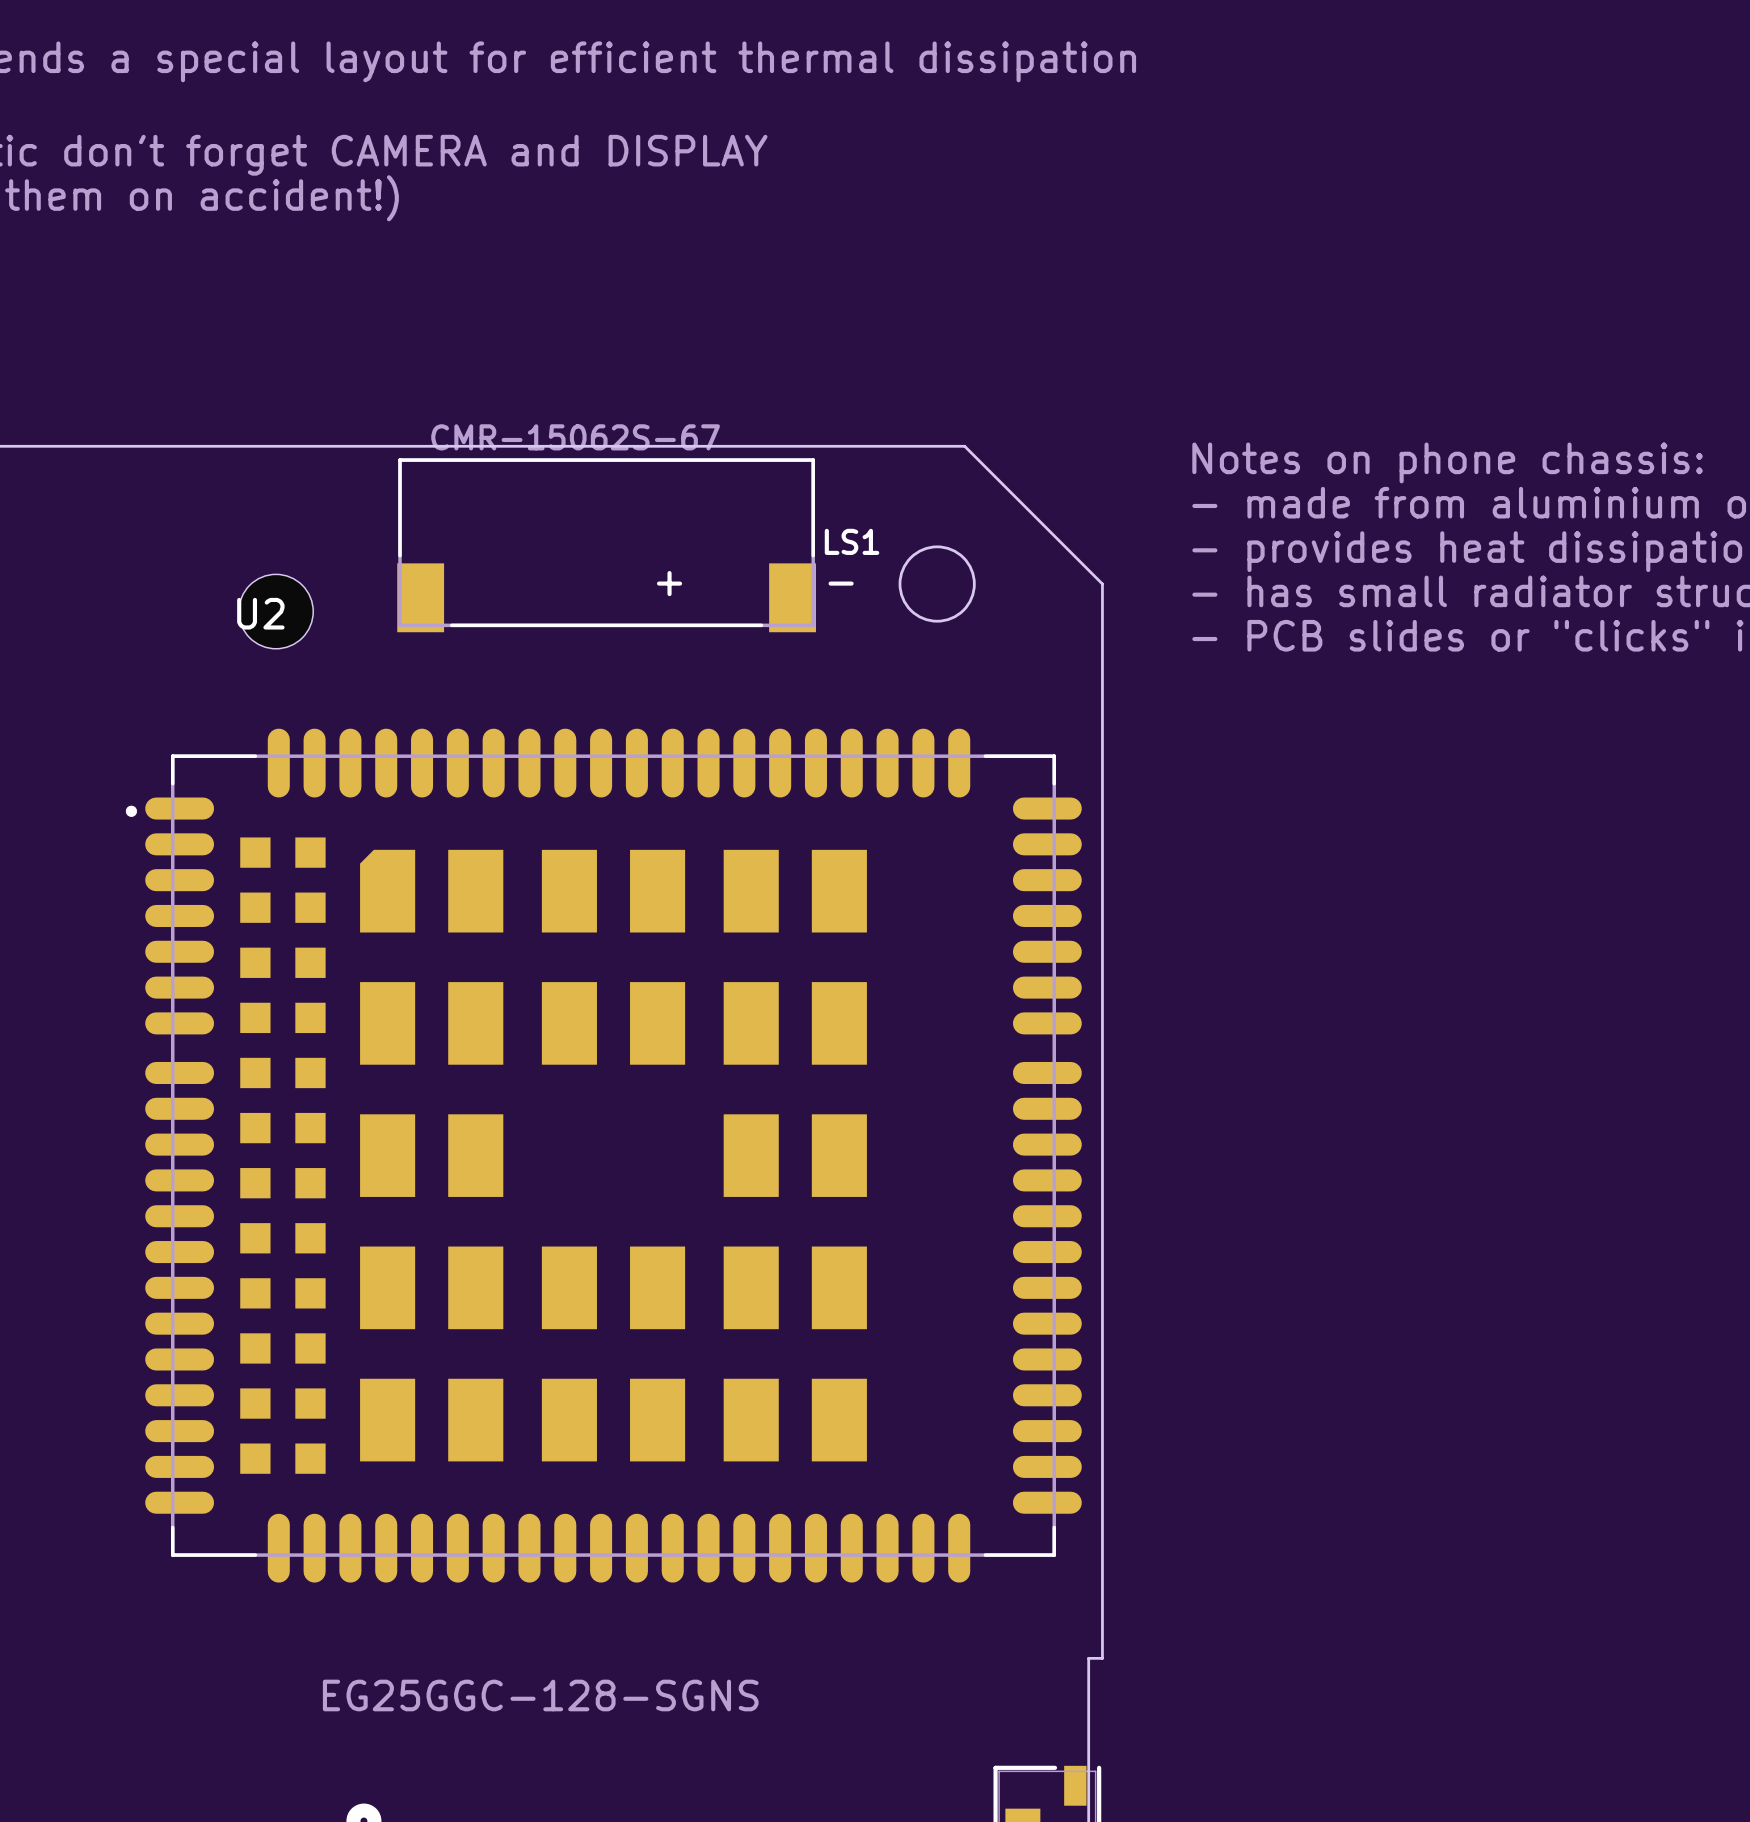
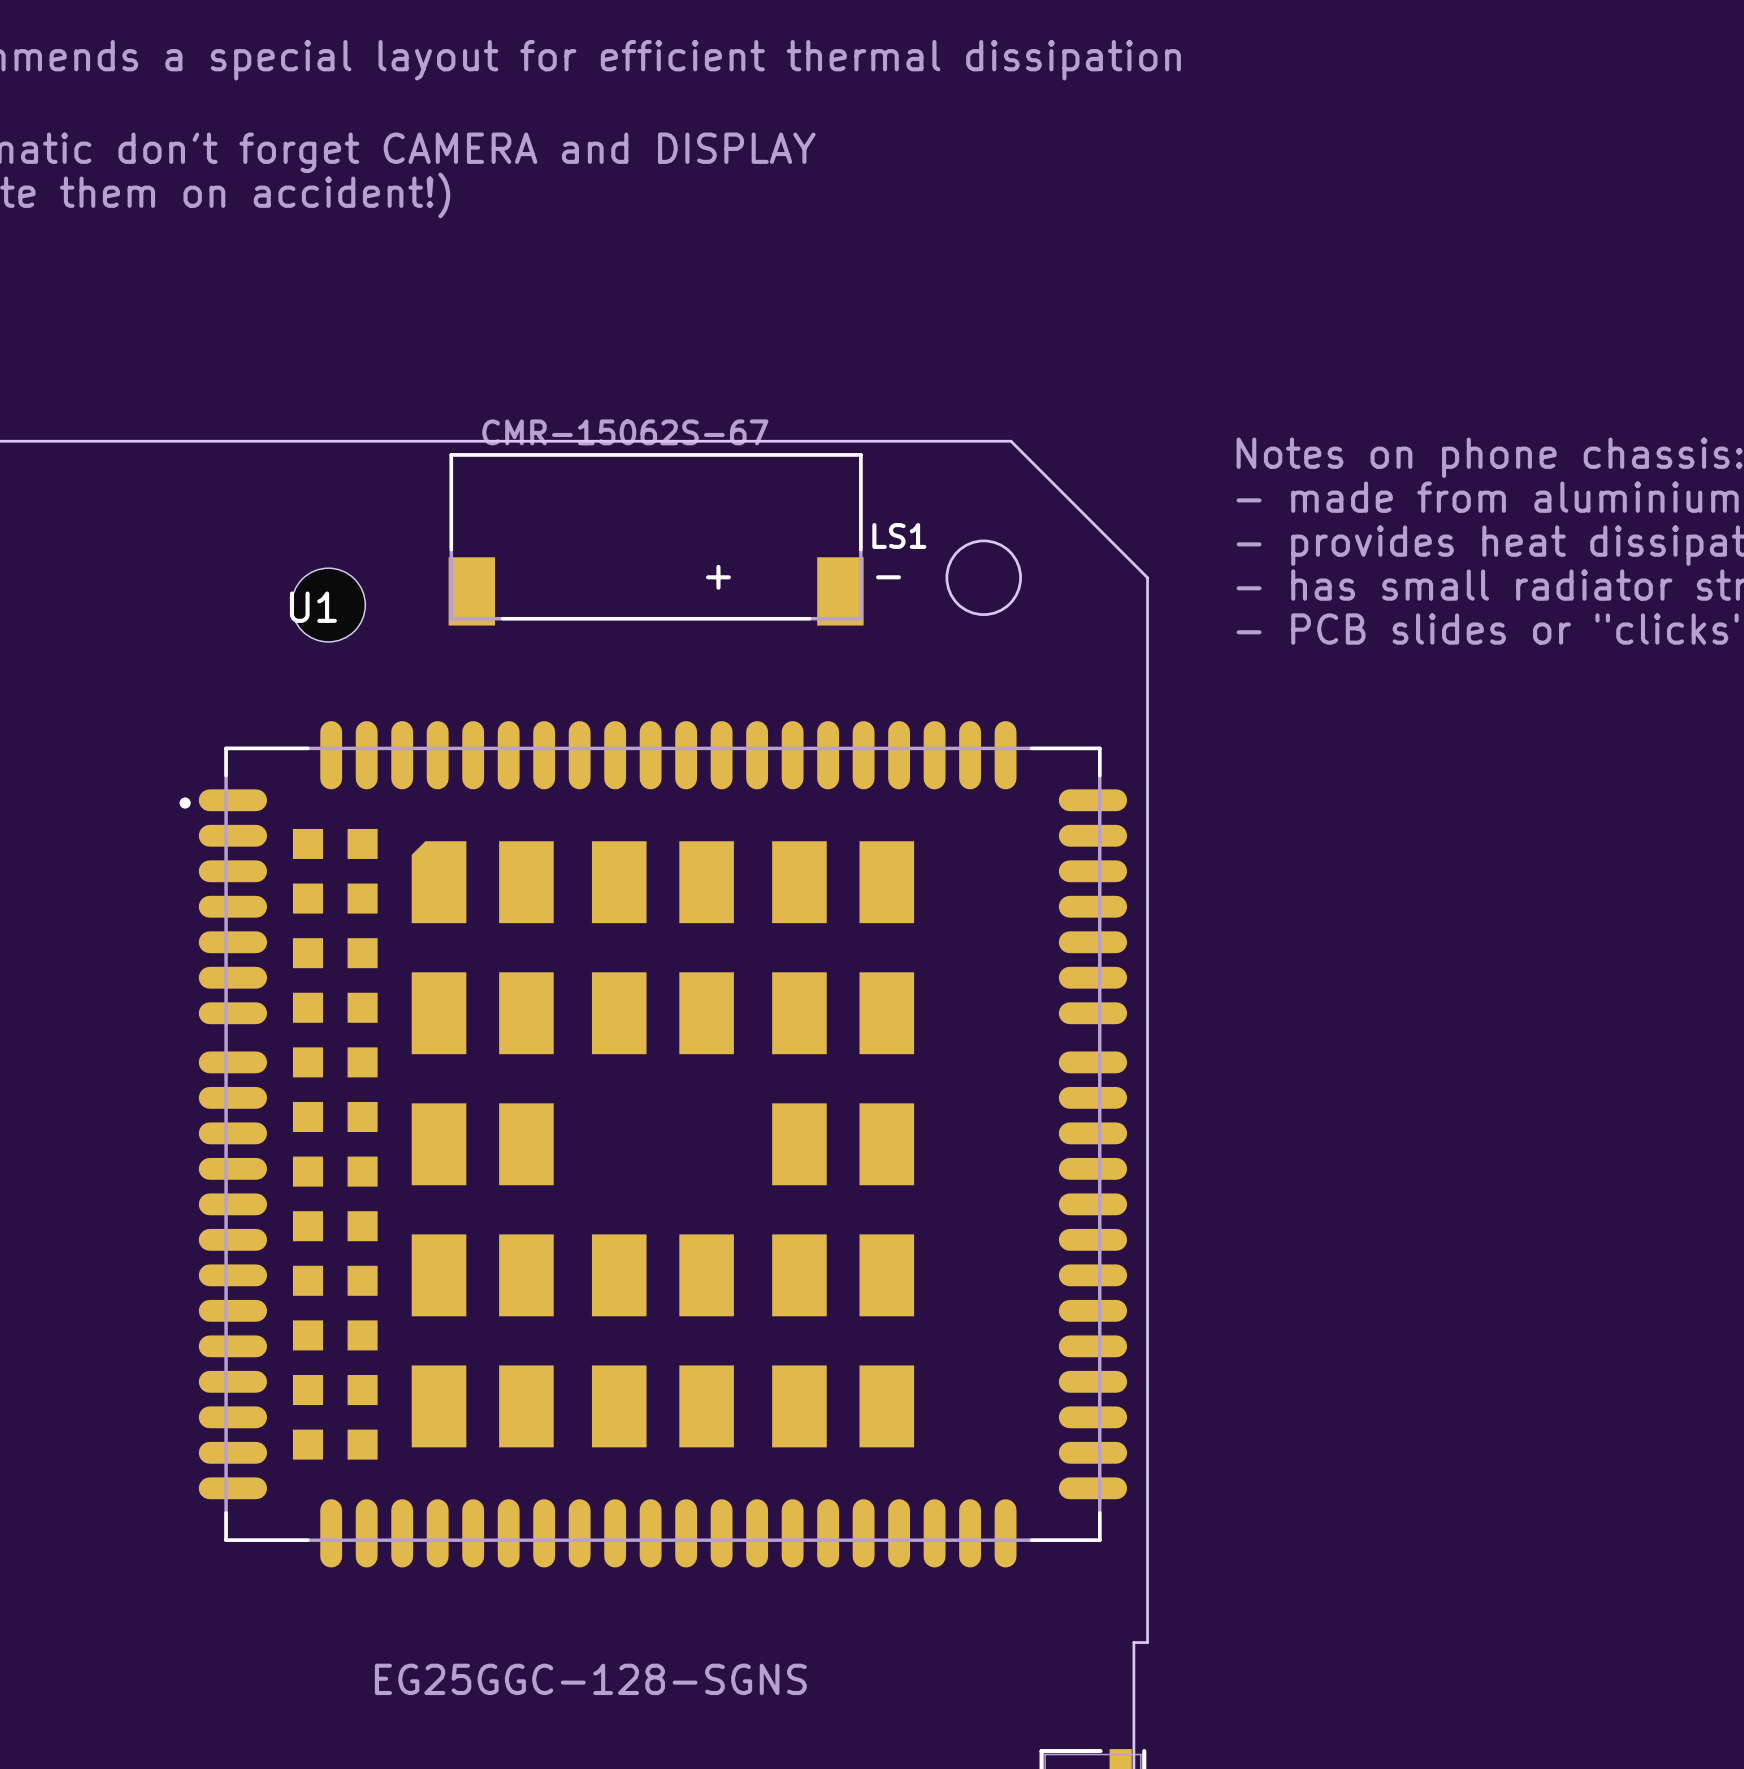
U2 name: U2 (260, 613) -> U1 (313, 607)

